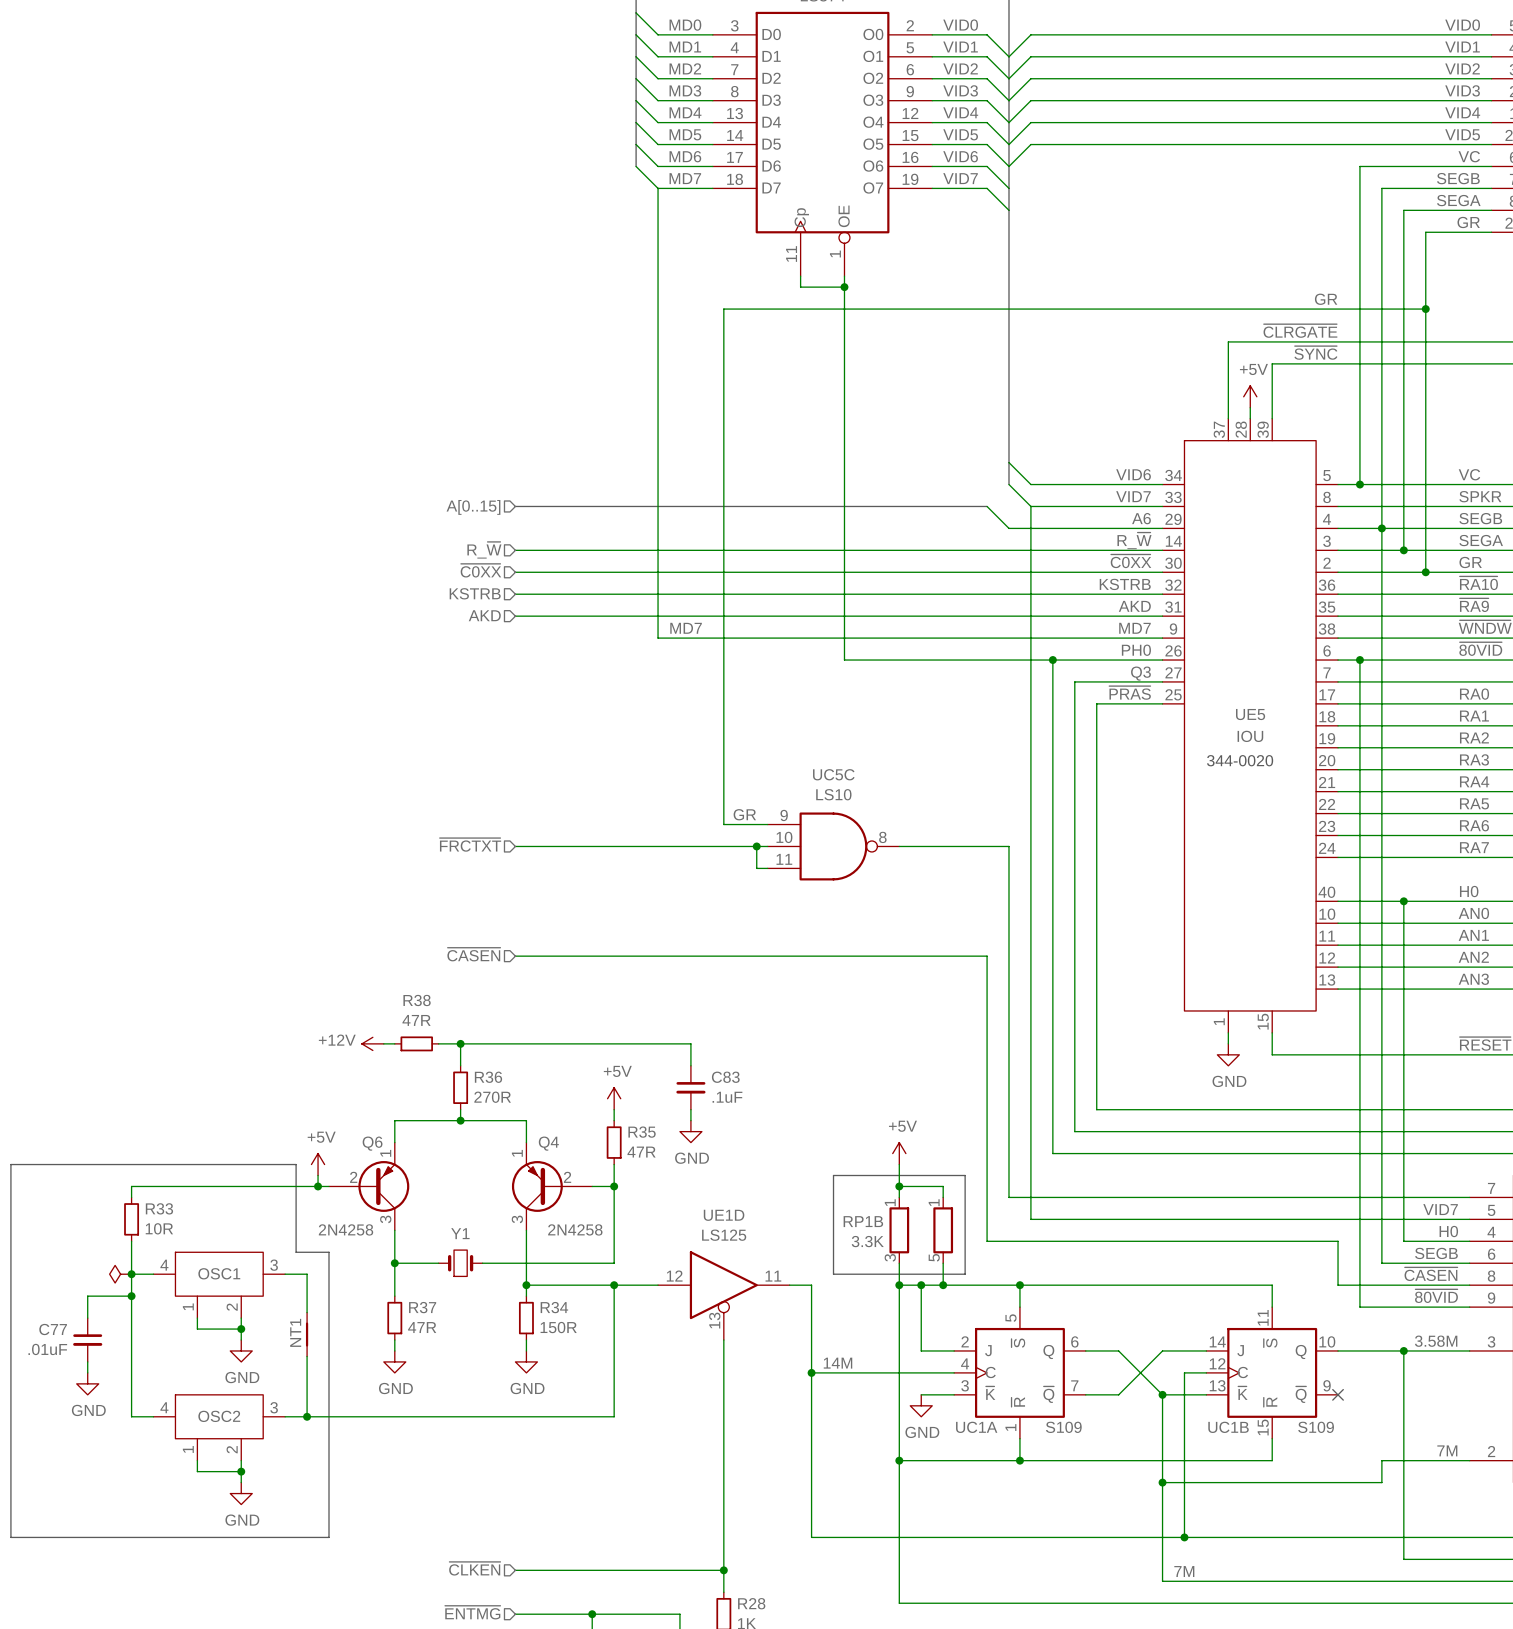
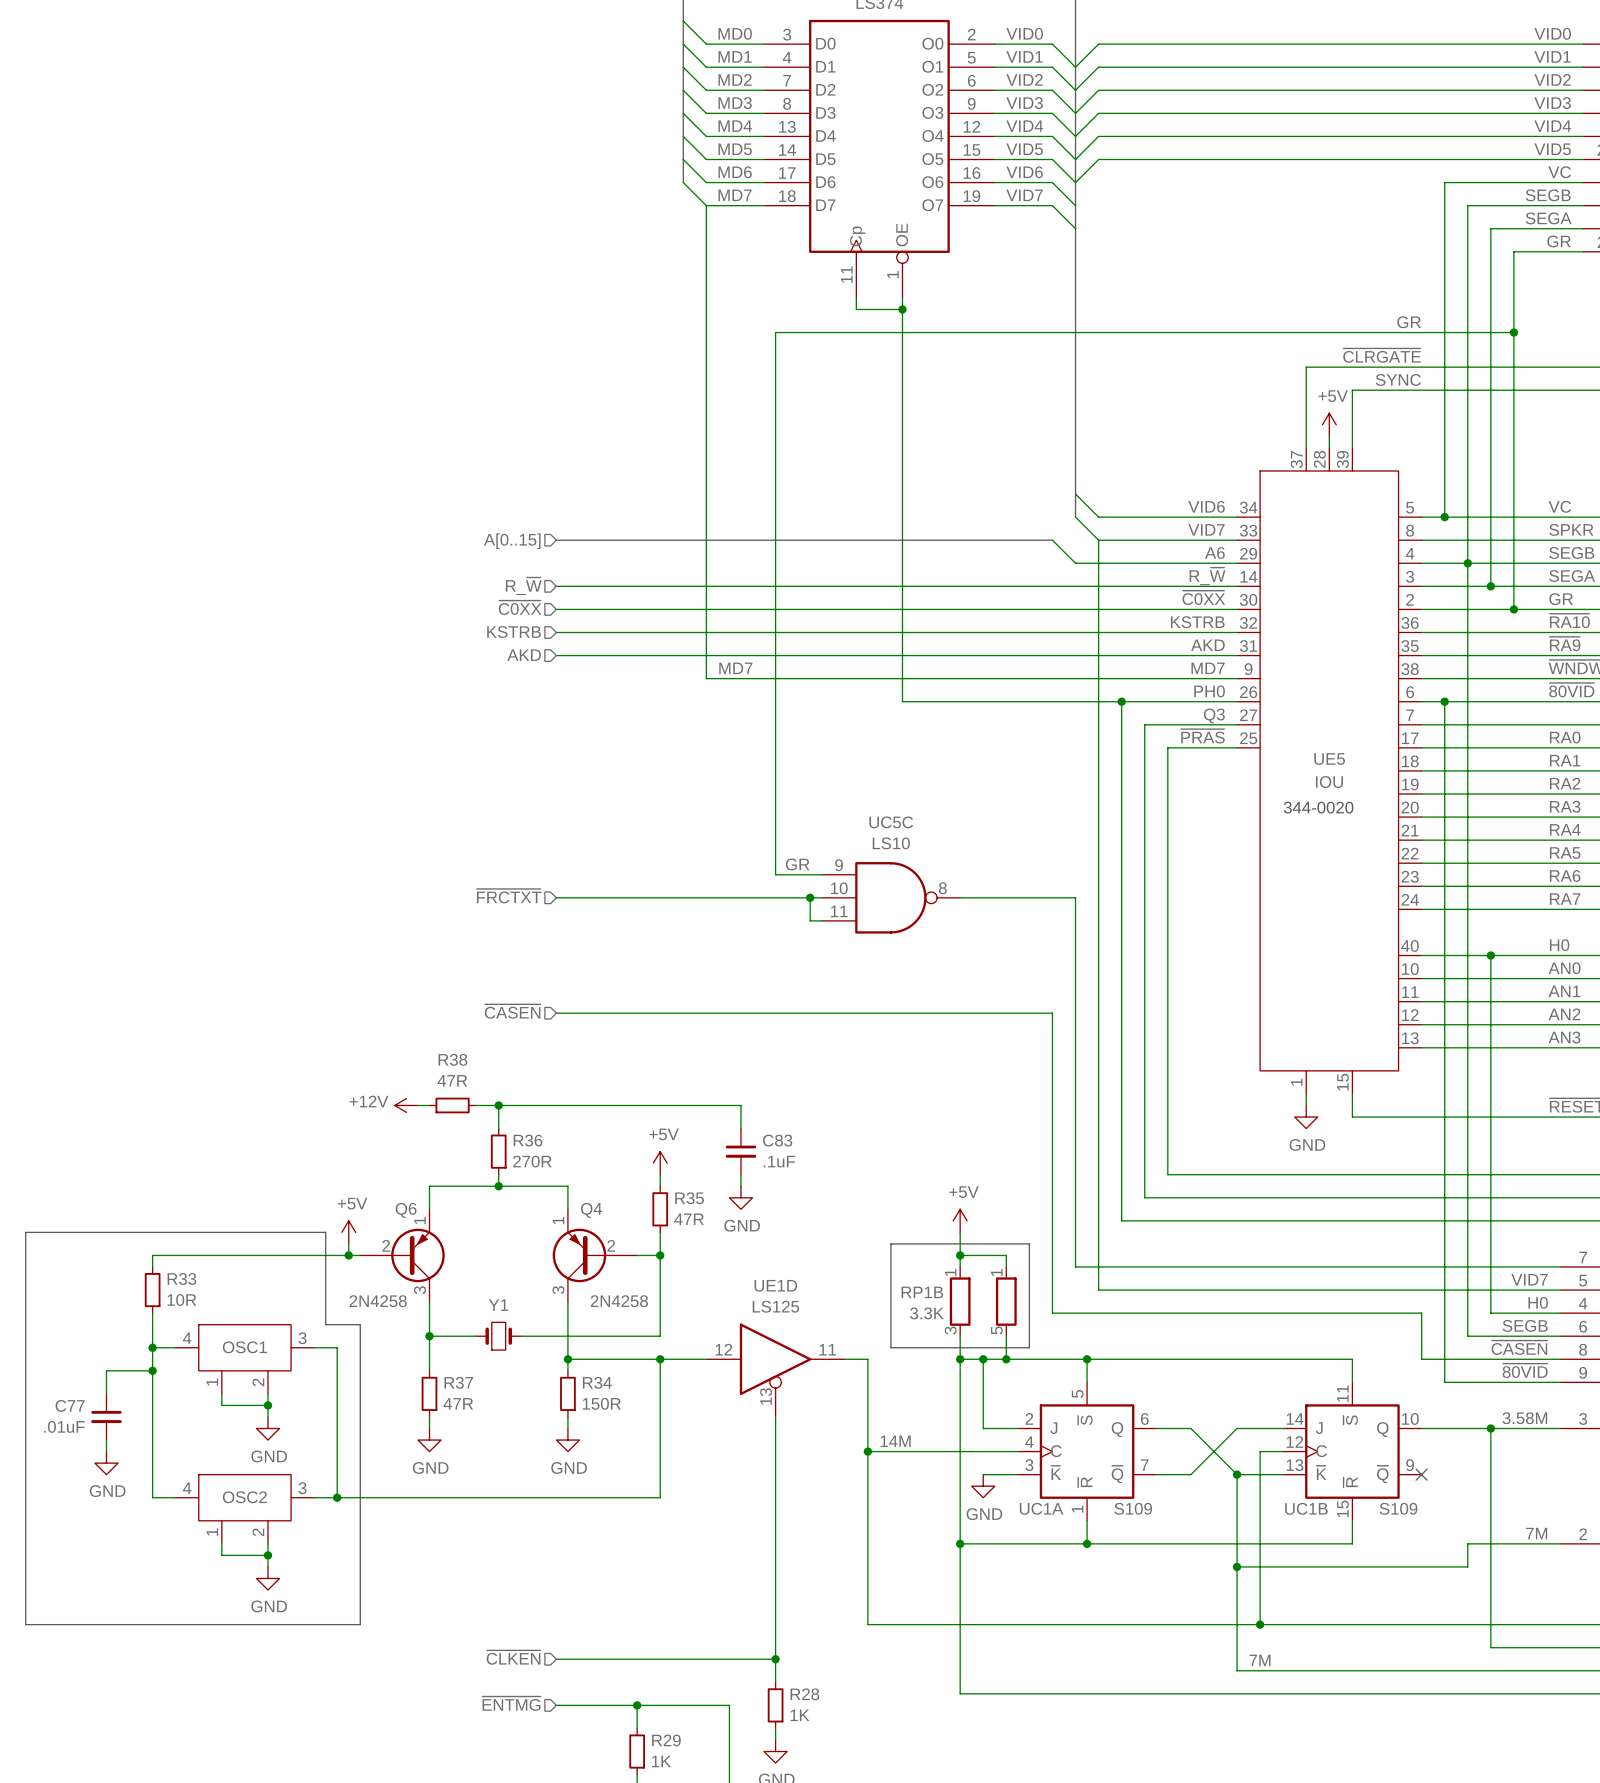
label: ~{SYNC} (1315, 352) -> SYNC (1398, 379)
power symbol: (120, 1274) -> none
NT1: (307, 1334) -> none

